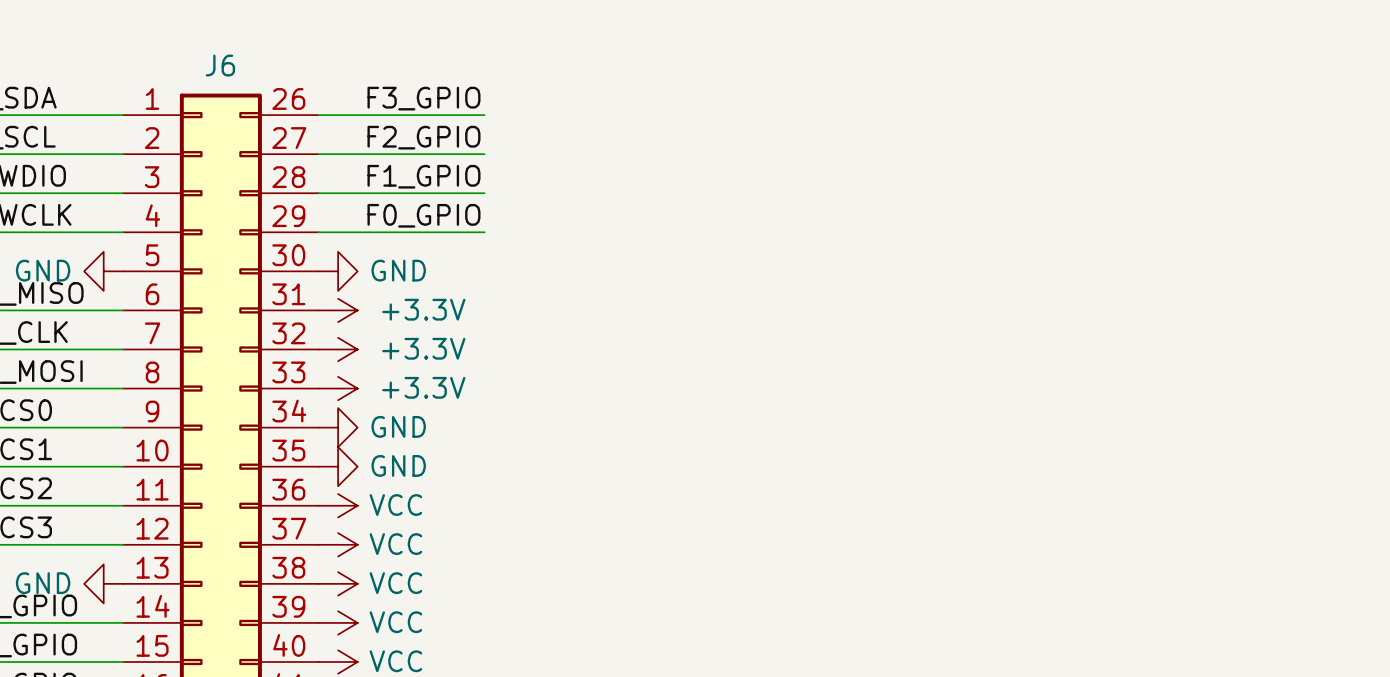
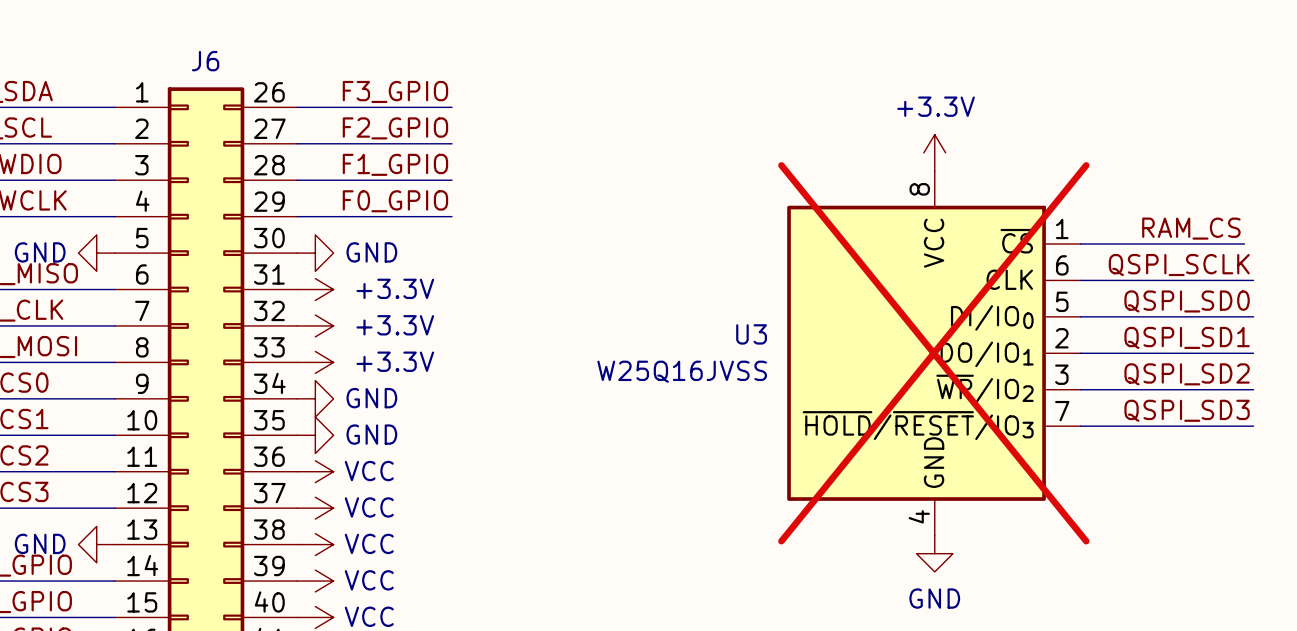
power symbol: none -> +3.3V (934, 152)
label: none -> RAM_CS (1191, 228)
wire: none -> (1080, 243) (1244, 243)
label: none -> QSPI_SCLK (1179, 265)
wire: none -> (1080, 280) (1253, 280)
label: none -> QSPI_SD0 (1187, 301)
wire: none -> (1080, 316) (1253, 316)
label: none -> QSPI_SD1 (1187, 337)
U3: none -> W25Q16JVSS (933, 353)
wire: none -> (1080, 353) (1253, 353)
label: none -> QSPI_SD2 (1187, 374)
wire: none -> (1080, 389) (1253, 389)
label: none -> QSPI_SD3 (1187, 410)
wire: none -> (1080, 426) (1253, 426)
power symbol: none -> GND (934, 553)

